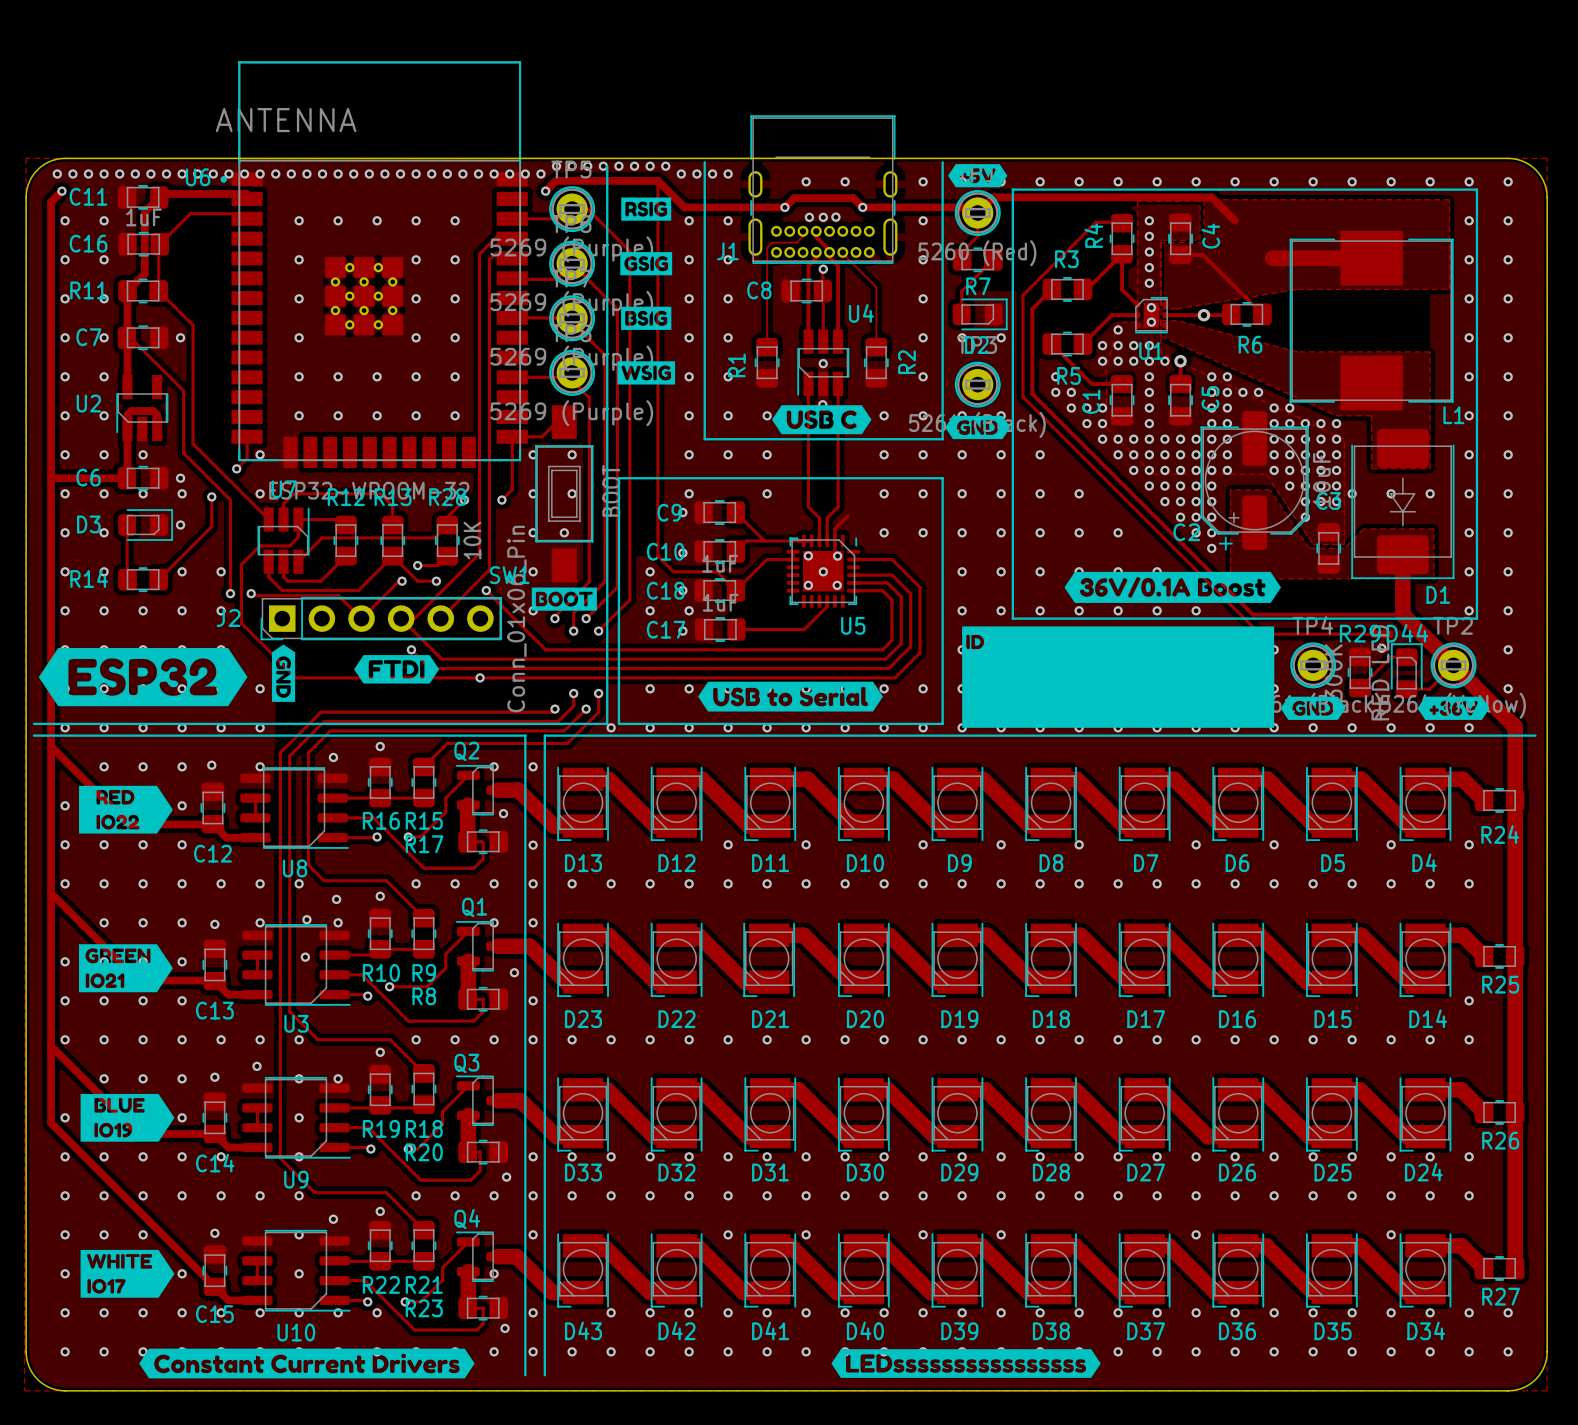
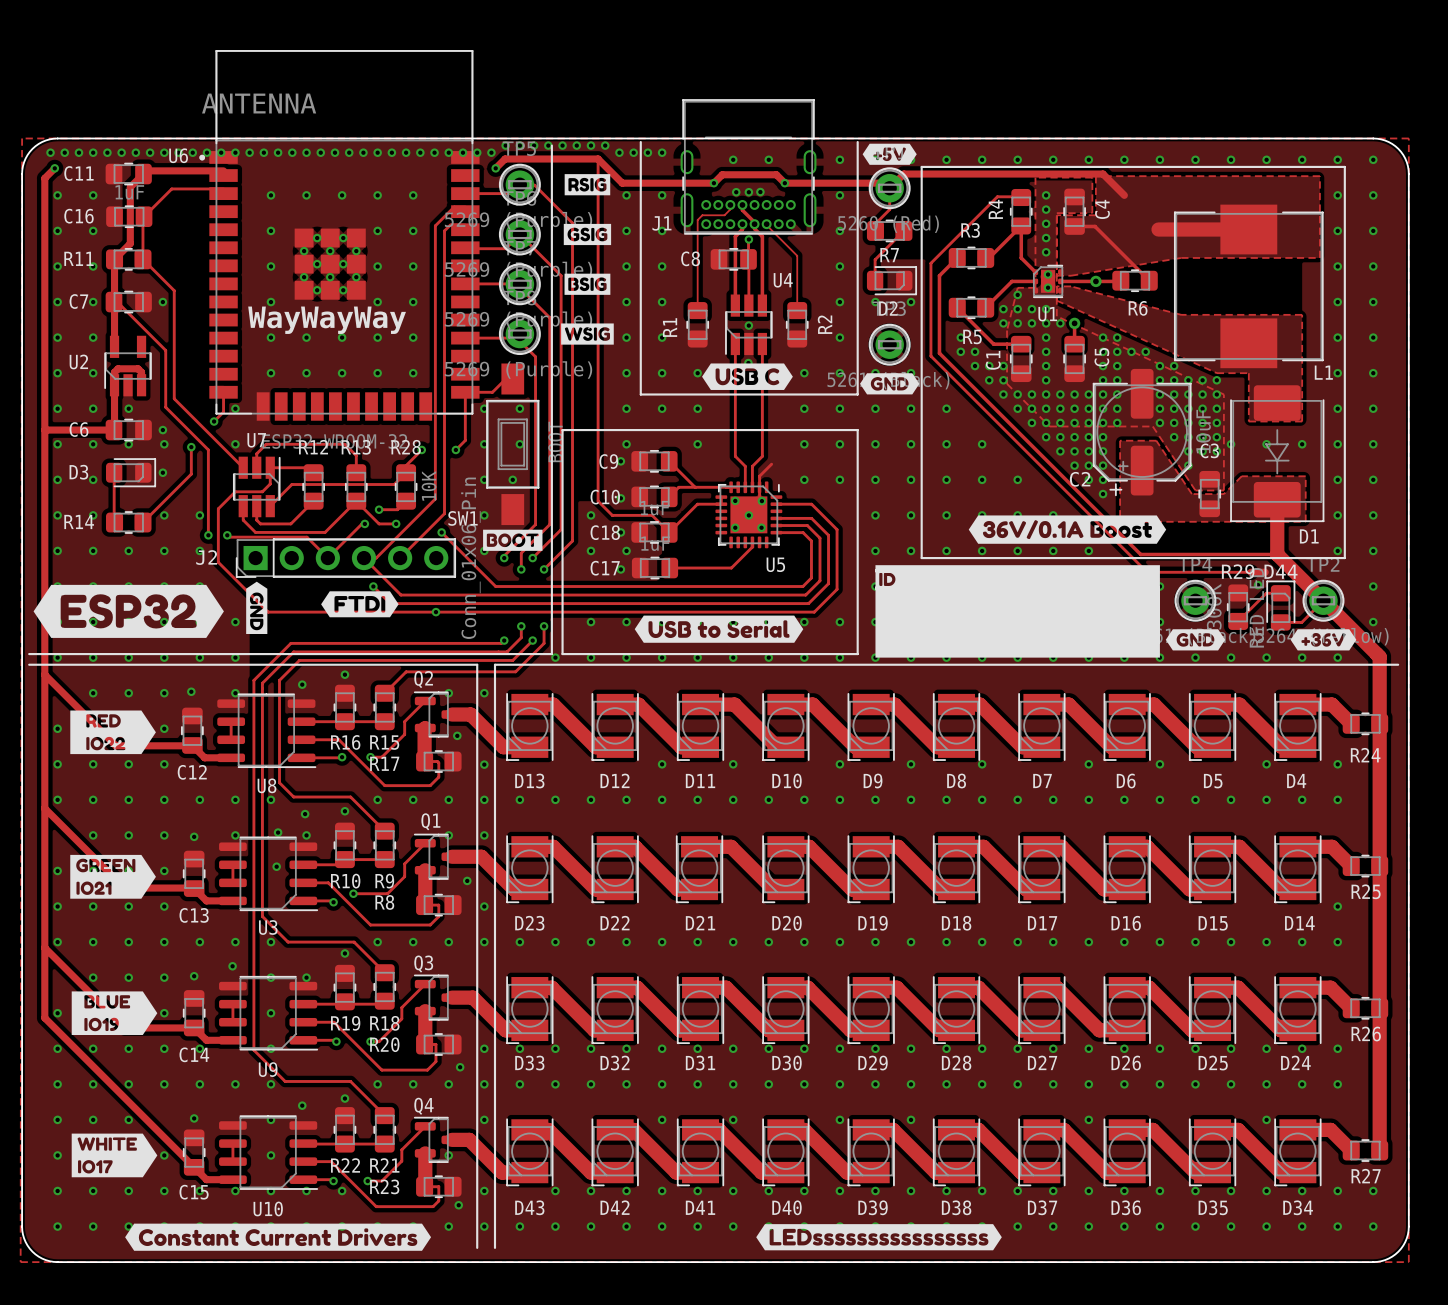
text: none -> WayWayWay (327, 320)

